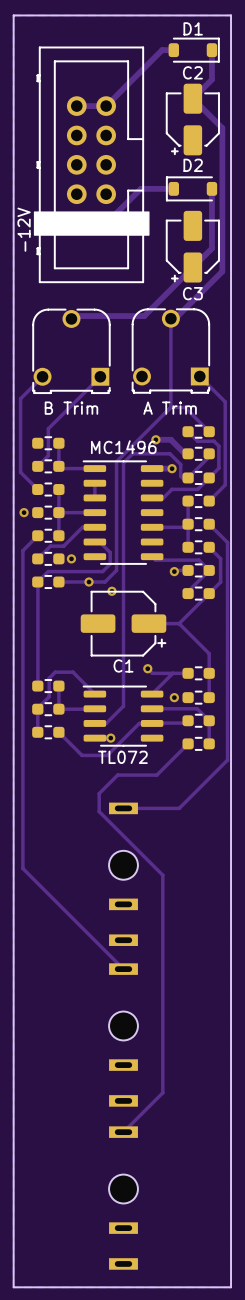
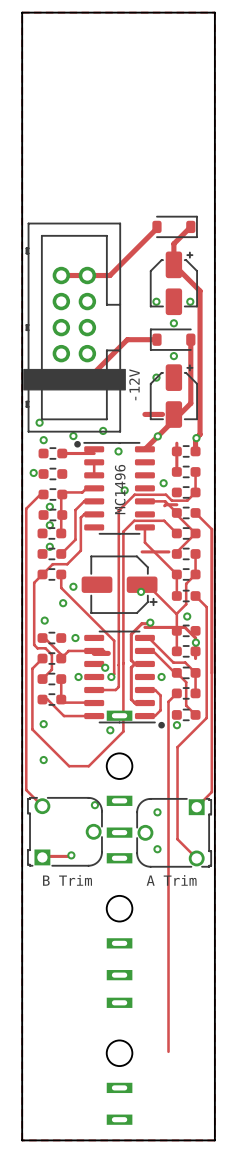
track: (173, 50) (162, 50) (106, 106) (76, 106) -> none
D1: (194, 50) -> none
track: (211, 50) (211, 79) (192, 98) (222, 128) (222, 271) (175, 318) (170, 318) (170, 407) (116, 461) (116, 570) (105, 582) (58, 582) -> none
C2: (192, 119) -> none
part: (91, 164) -> none
track: (173, 188) (140, 188) (106, 223) (76, 223) -> none
D2: (191, 188) -> none
track: (211, 188) (211, 248) (144, 316) (74, 316) (71, 318) -> none
C3: (192, 246) -> none
track: none -> (156, 226) (109, 275) (61, 275)
part: none -> (174, 226)
track: none -> (190, 226) (173, 243) (173, 264) (200, 290) (200, 434) (195, 439) (195, 451)
part: none -> (173, 283)
via: none -> (156, 301)
via: none -> (190, 301)
part: (71, 351) -> none
part: (170, 351) -> none
via: none -> (173, 323)
part: none -> (74, 327)
track: (42, 376) (20, 398) (20, 472) (37, 489) -> none
track: (100, 376) (48, 428) (48, 455) (37, 466) -> none
track: (199, 376) (225, 401) (225, 485) (209, 501) -> none
track: none -> (156, 339) (127, 339) (87, 379) (61, 379)
part: none -> (172, 339)
track: none -> (190, 339) (190, 403) (145, 449)
via: none -> (173, 356)
track: (170, 407) (184, 407) (209, 431) -> none
text: B Trim (71, 408) -> none
text: A Trim (170, 408) -> none
track: (188, 431) (197, 441) (213, 441) (218, 446) (218, 468) (197, 489) (171, 489) (163, 497) (152, 497) -> none
part: (198, 431) -> none
track: (155, 439) (170, 439) (184, 453) (188, 453) -> none
via position: (155, 439) -> (156, 377)
part: (48, 443) -> none
track: (58, 443) (58, 466) (61, 468) (94, 468) -> none
part value rotation: 0° (123, 447) -> 90° counterclockwise (120, 489)
part: none -> (173, 396)
part: (198, 453) -> none
track: (209, 453) (209, 456) (188, 477) (180, 476) (180, 464) (170, 453) (132, 453) (123, 462) (123, 706) (106, 723) (94, 723) -> none
part: (48, 466) -> none
via: (172, 468) -> none
via: none -> (39, 422)
part: (198, 477) -> none
track: (94, 483) (94, 497) -> (94, 462) (94, 475)
via: none -> (103, 430)
part: (48, 489) -> none
track: (58, 489) (58, 535) -> none
via: none -> (73, 436)
via: none -> (157, 436)
via: none -> (196, 438)
via: none -> (43, 440)
drawing: none -> [74, 440, 81, 448]
part: (198, 501) -> none
via: none -> (118, 451)
part: none -> (186, 451)
via: (24, 512) -> none
part position: (123, 512) -> (119, 488)
track: (188, 524) (184, 527) (152, 527) -> none
part: (198, 524) -> none
track: (209, 524) (227, 542) (227, 598) -> (195, 512) (211, 529)
track: (94, 527) (82, 527) (63, 546) (50, 546) (37, 558) -> none
track: (188, 533) (188, 547) -> none
part: none -> (186, 471)
track: none -> (195, 471) (195, 492) (187, 500) (171, 500) (165, 494) (134, 494) (118, 510) (118, 665)
via: none -> (33, 472)
track: (37, 535) (22, 550) (22, 868) (123, 969) -> none
track: (94, 542) (99, 542) (110, 552) (110, 564) (102, 571) (48, 571) (37, 582) -> none
via: none -> (163, 483)
part: (198, 547) -> none
track: (209, 547) (220, 558) (220, 582) (179, 623) (209, 653) (209, 697) -> none
track: none -> (94, 488) (86, 488) (82, 492) (61, 492) (61, 533)
via: none -> (124, 490)
track: none -> (42, 492) (26, 508) (26, 790) (42, 806)
track: (152, 556) (155, 560) (198, 560) (209, 570) (188, 593) -> none
part: none -> (186, 492)
via: (71, 558) -> none
track: none -> (94, 501) (84, 501) (75, 510) (75, 539) (61, 553)
track: none -> (144, 501) (165, 501) (176, 512)
part: (198, 570) -> none
via: (174, 571) -> none
via: none -> (49, 506)
part: none -> (186, 512)
track: none -> (94, 514) (84, 514) (80, 517) (80, 550) (67, 564) (52, 564) (34, 582) (34, 644) (37, 648) (45, 648) (51, 654) (51, 669) (42, 679)
track: none -> (176, 514) (195, 533) (176, 552)
track: (37, 582) (37, 685) -> none
via: (89, 582) -> none
via: (111, 591) -> none
via: none -> (49, 525)
part: (198, 593) -> none
track: none -> (144, 527) (144, 542) (176, 574) (176, 594)
part: none -> (51, 533)
track: none -> (176, 533) (164, 520) (134, 520) (123, 531) (123, 663)
part: none -> (186, 533)
via: none -> (49, 546)
C1: (123, 623) -> none
part: none -> (51, 553)
part: none -> (186, 553)
track: none -> (195, 553) (195, 574) (186, 583) (186, 604) (176, 613)
part: none -> (51, 574)
track: none -> (61, 574) (61, 587) (114, 640) (114, 674) (111, 676)
part: none -> (186, 574)
part: none -> (119, 584)
track: none -> (142, 584) (147, 584) (176, 613)
via: none -> (73, 586)
track: (147, 668) (152, 673) (188, 673) -> none
track: (172, 673) (152, 694) -> none
track: none -> (195, 596) (206, 607) (206, 718) (177, 747) (177, 839) (196, 858)
via: none -> (63, 603)
part: (48, 686) -> none
track: (58, 686) (58, 709) (94, 708) -> none
track: none -> (176, 613) (176, 651)
track: (94, 694) (72, 672) (55, 672) (49, 678) (49, 696) (37, 708) (37, 732) -> none
via: none -> (187, 616)
via: (174, 697) -> none
part: (198, 697) -> none
via: none -> (44, 620)
track: none -> (150, 622) (141, 623) (131, 634) (131, 660) (134, 663)
via: none -> (150, 622)
part: (48, 709) -> none
part: none -> (186, 630)
part: TL072 (123, 716) -> none
track: none -> (43, 637) (61, 654) (61, 658)
part: none -> (51, 638)
via: none -> (75, 638)
track: none -> (148, 637) (173, 662) (185, 662) (195, 672) (195, 693)
track: (188, 720) (185, 723) (139, 723) (107, 755) (82, 755) (58, 732) -> none
part: (198, 720) -> none
via: none -> (195, 642)
part: (48, 732) -> none
track: none -> (104, 650) (68, 650) (61, 658)
track: none -> (152, 650) (174, 672)
part: none -> (186, 651)
via: (110, 738) -> none
track: none -> (42, 658) (32, 668) (32, 729) (69, 766) (88, 766) (123, 731) (123, 663)
part: none -> (51, 658)
track: (188, 743) (156, 775) (117, 775) (99, 793) (99, 811) (162, 875) (162, 1092) (123, 1132) -> none
part: (198, 743) -> none
track: none -> (134, 663) (131, 667) (131, 699) (134, 703) (144, 703)
track: none -> (118, 665) (118, 686) (115, 690) (94, 690)
via: none -> (105, 667)
track: none -> (176, 672) (186, 682) (186, 705) (195, 714)
part: none -> (186, 672)
track: (227, 760) (179, 808) (123, 808) -> (211, 672) (211, 792) (196, 807)
via: none -> (78, 676)
via: none -> (111, 676)
part: none -> (119, 676)
via: none -> (161, 676)
part: none -> (51, 679)
track: none -> (61, 679) (61, 699) (64, 702) (94, 703)
track: none -> (144, 690) (155, 690) (160, 695) (160, 710) (154, 716) (144, 716)
track: none -> (176, 693) (168, 701) (168, 1051)
part: none -> (186, 693)
track: none -> (42, 699) (47, 699) (64, 716) (94, 716)
part: none -> (51, 699)
part: none -> (186, 714)
drawing: none -> [158, 721, 165, 729]
via: none -> (43, 724)
via: none -> (176, 725)
via: none -> (110, 730)
via: none -> (43, 760)
via: none -> (94, 805)
via: none -> (157, 812)
part: none -> (64, 831)
part: none -> (174, 832)
via: none -> (157, 849)
track: none -> (71, 855) (42, 857)
via: none -> (71, 855)
text: none -> B Trim (67, 880)
text: none -> A Trim (171, 880)

